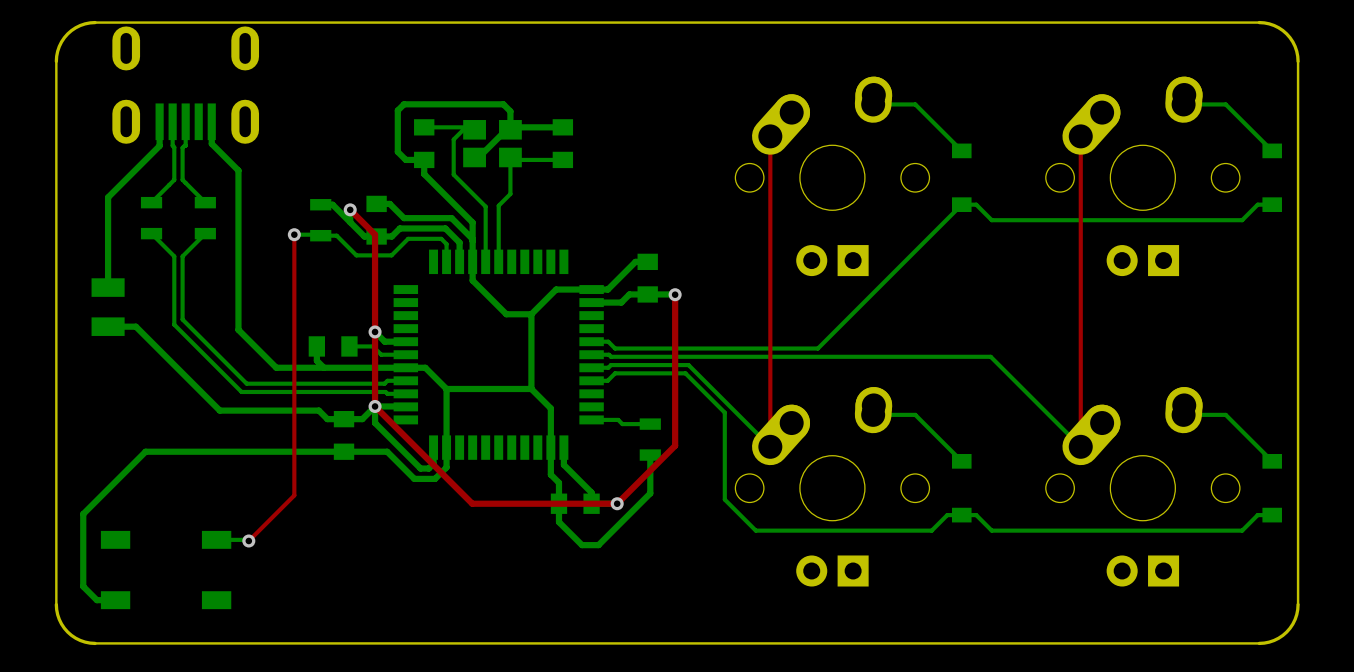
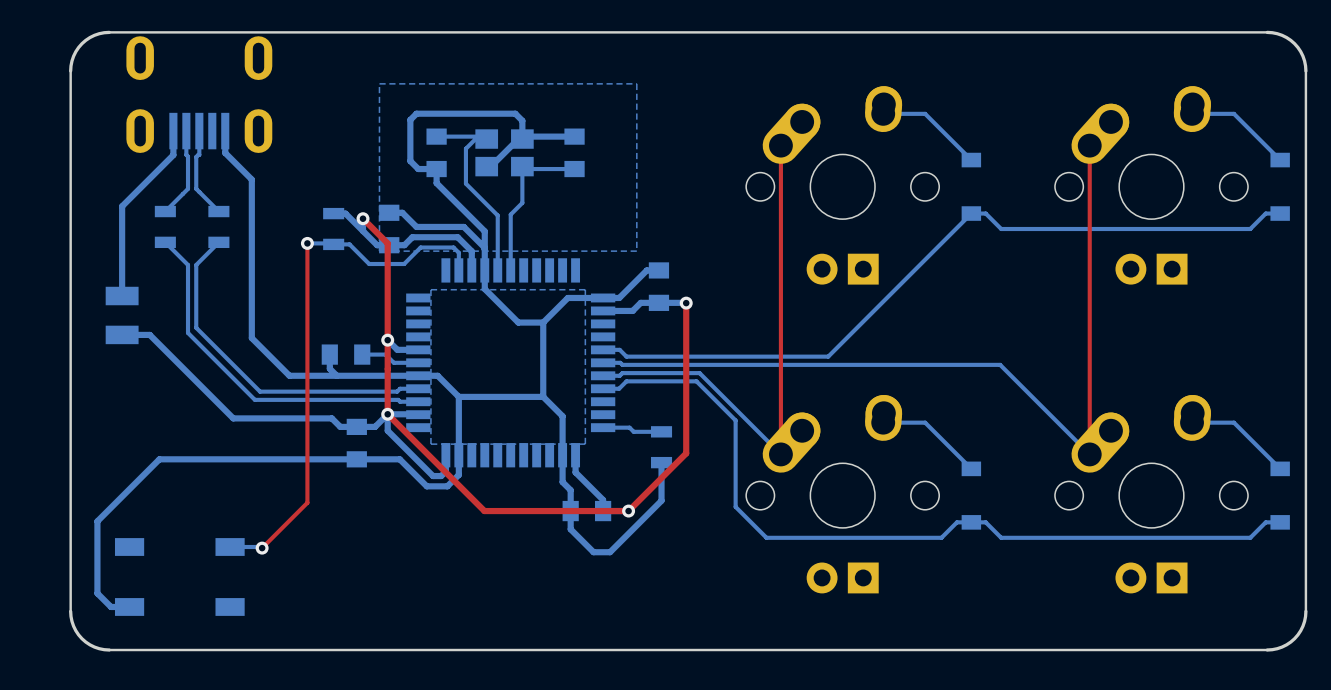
bottom zone outline: none -> (379, 83) (636, 83) (636, 251) (379, 251) (379, 83)
bottom zone outline: none -> (430, 289) (585, 289) (585, 444) (430, 444) (430, 289)

